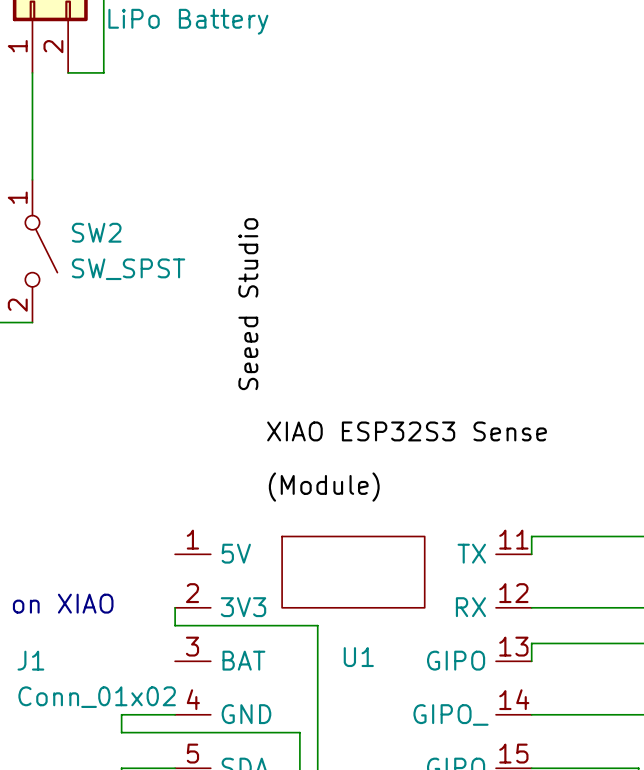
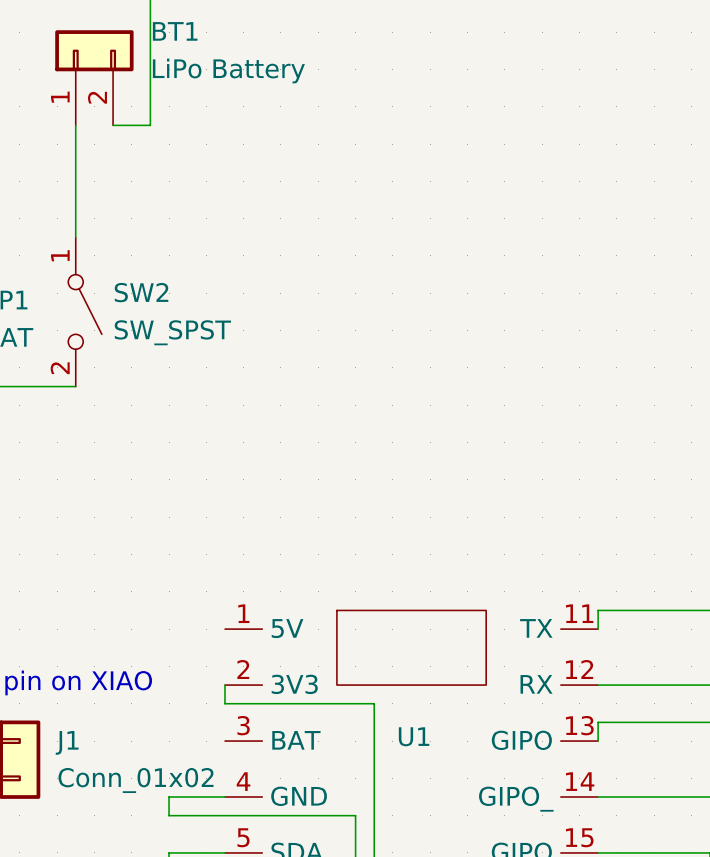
label: Seeed Studio (248, 304) -> none
label: XIAO ESP32S3 Sense (407, 431) -> none
label: (Module) (324, 487) -> none

